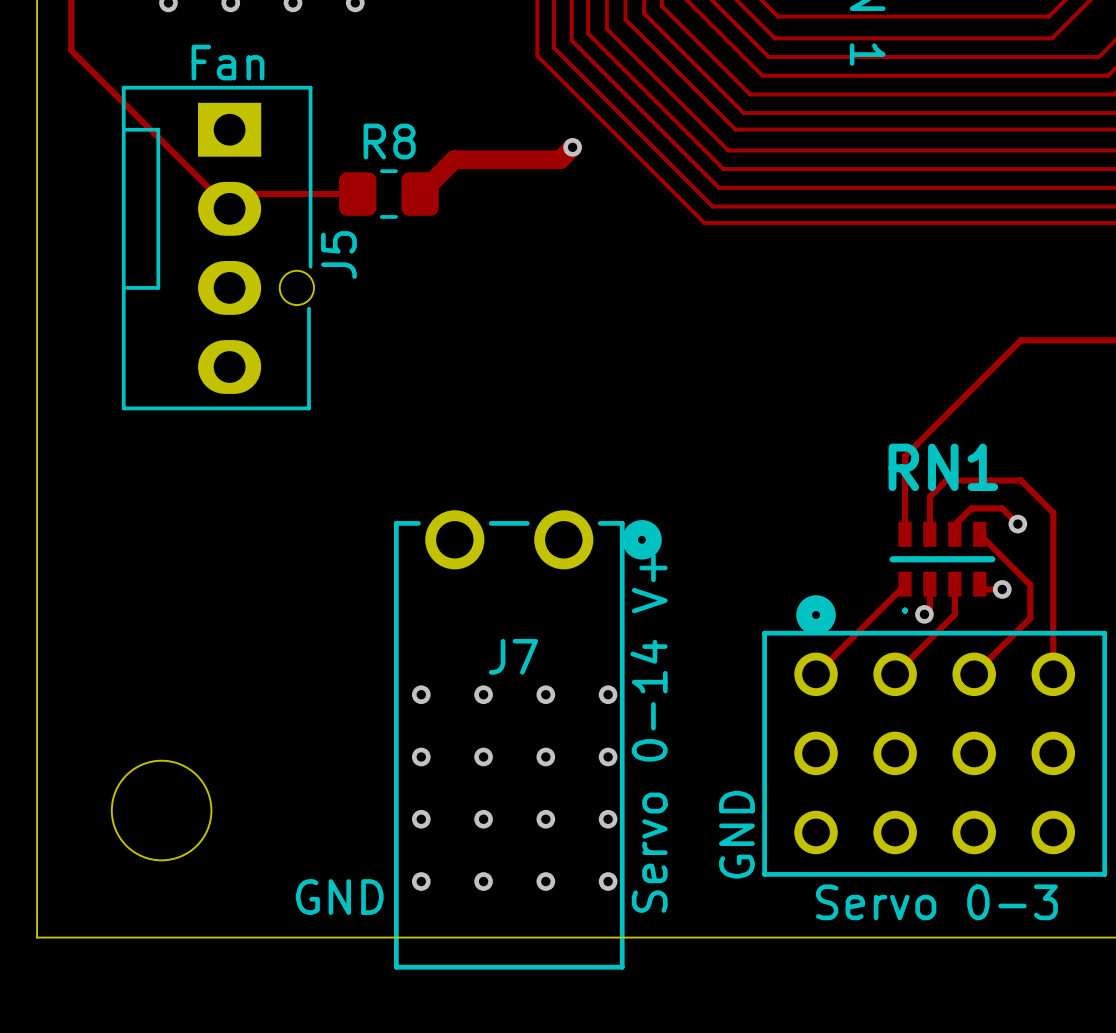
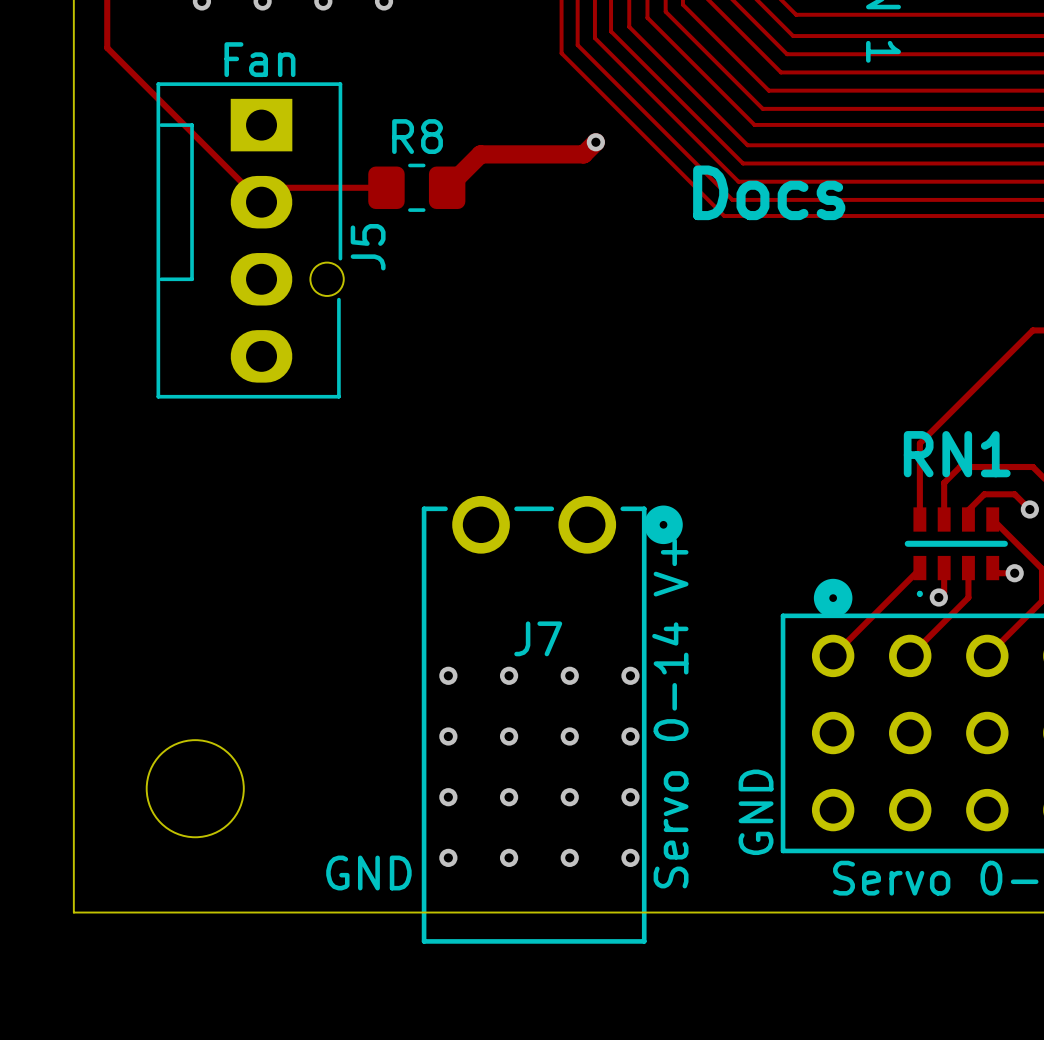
text: none -> Docs (769, 192)

